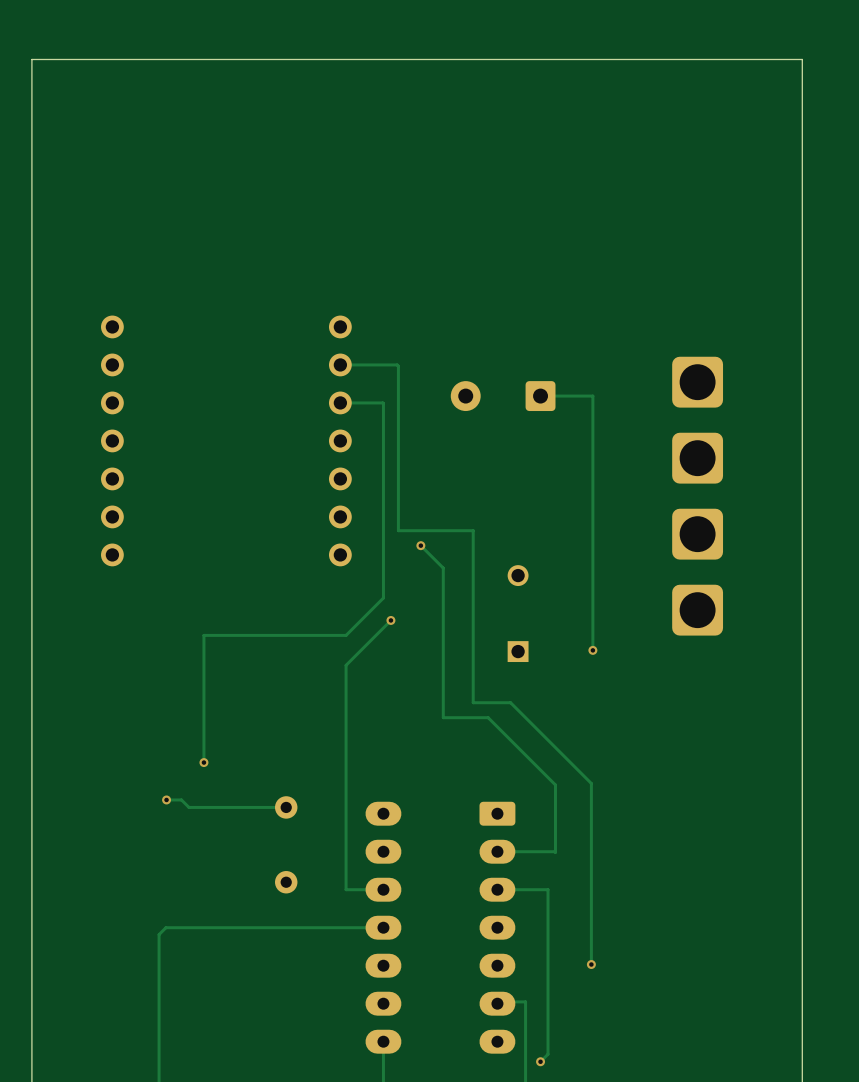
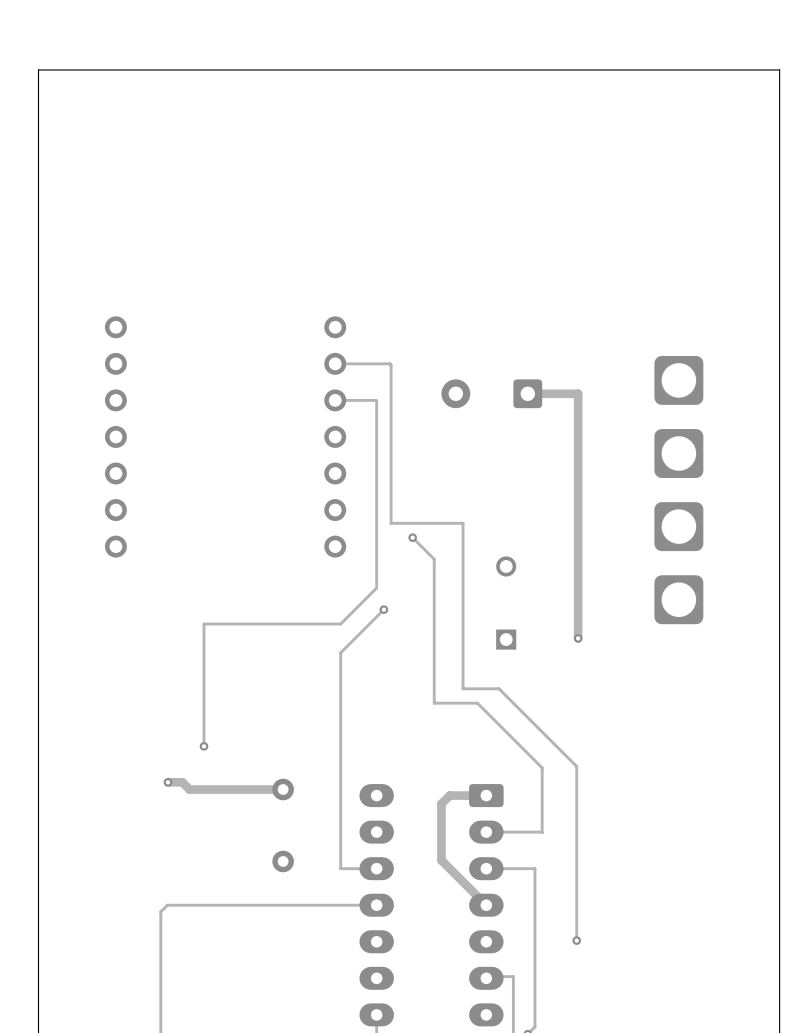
track width: thin (540, 396) (592, 396) (592, 650) -> thick (527, 393) (578, 393) (578, 638)
track width: thin (166, 799) (181, 799) (188, 807) (286, 807) -> thick (168, 782) (182, 782) (189, 789) (283, 789)
track: none -> (486, 795) (449, 795) (441, 803) (441, 860) (486, 905)

